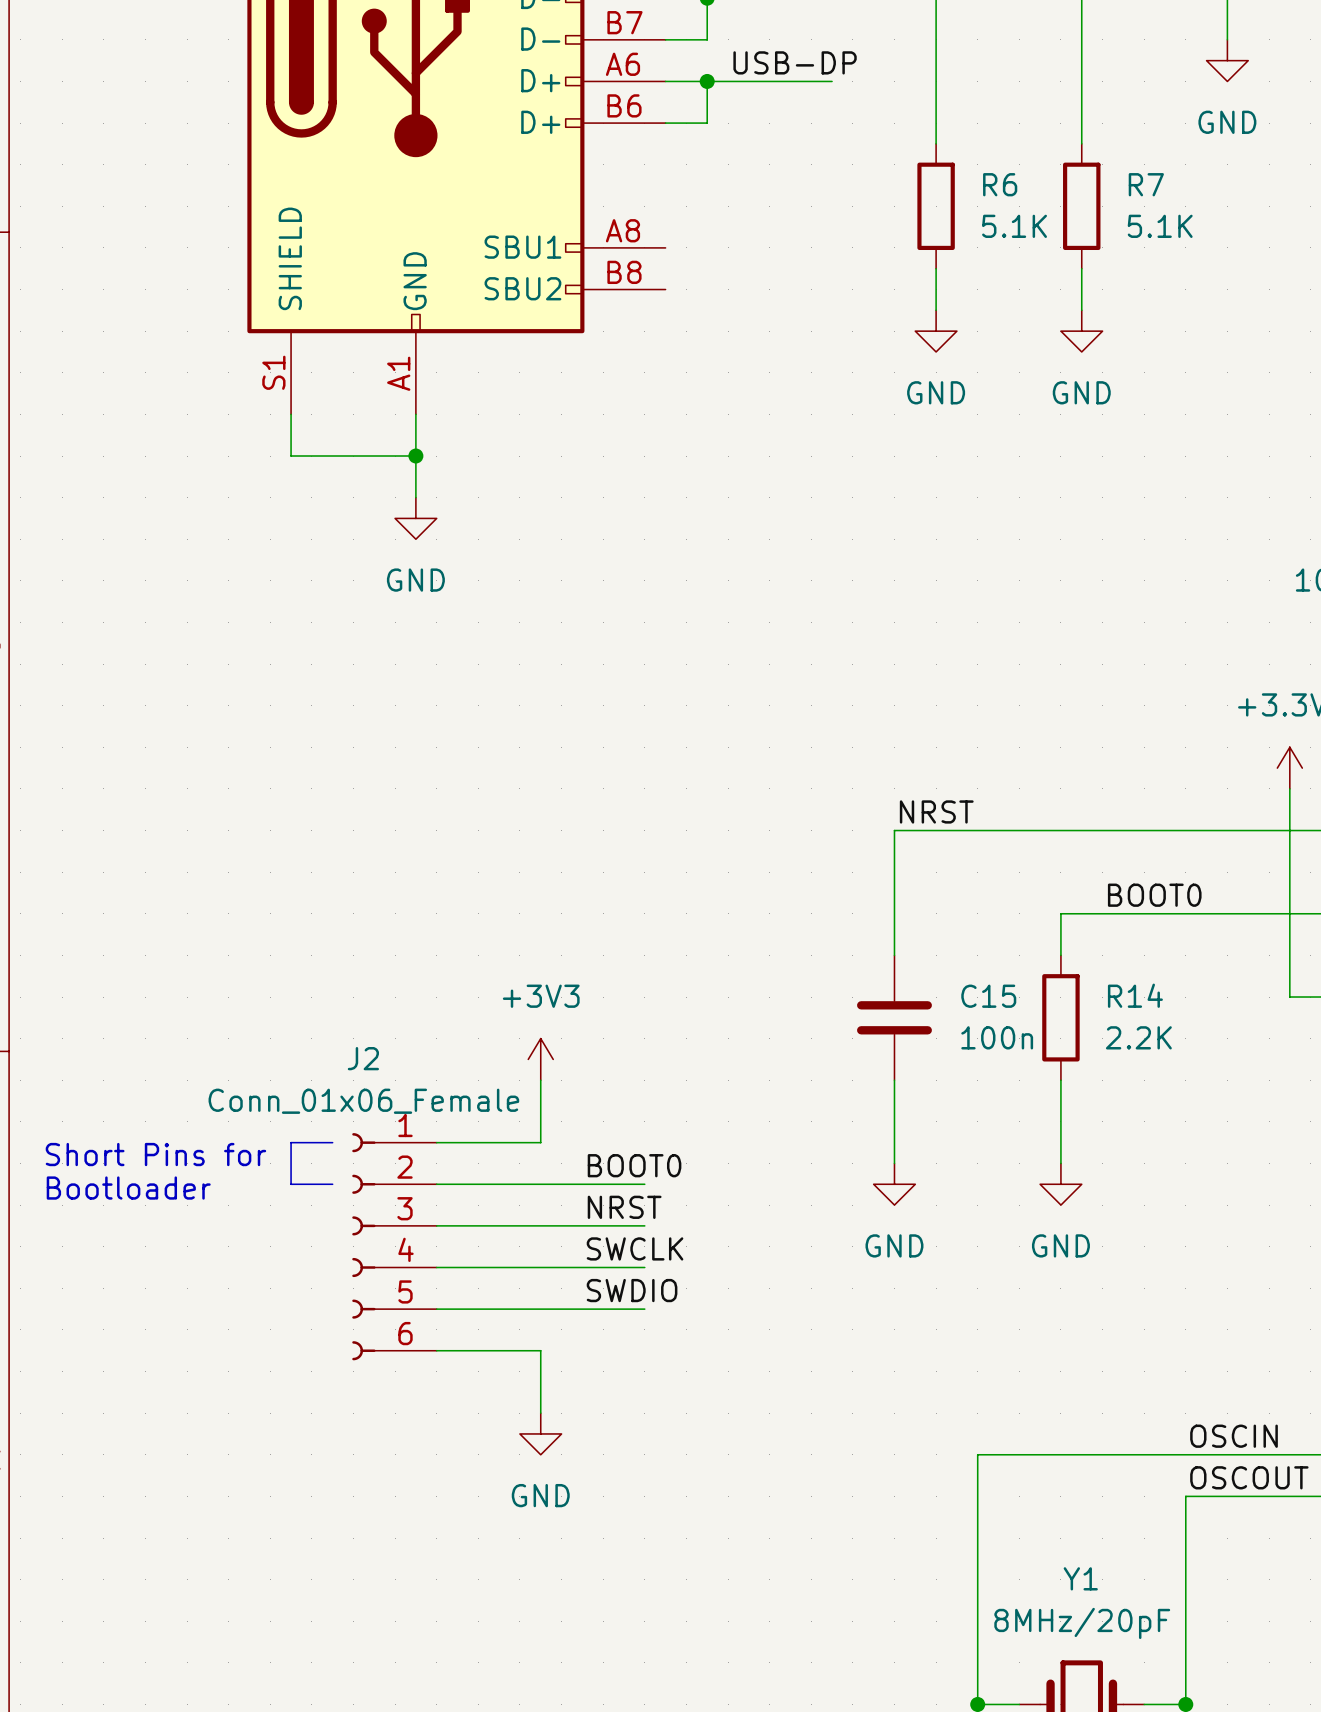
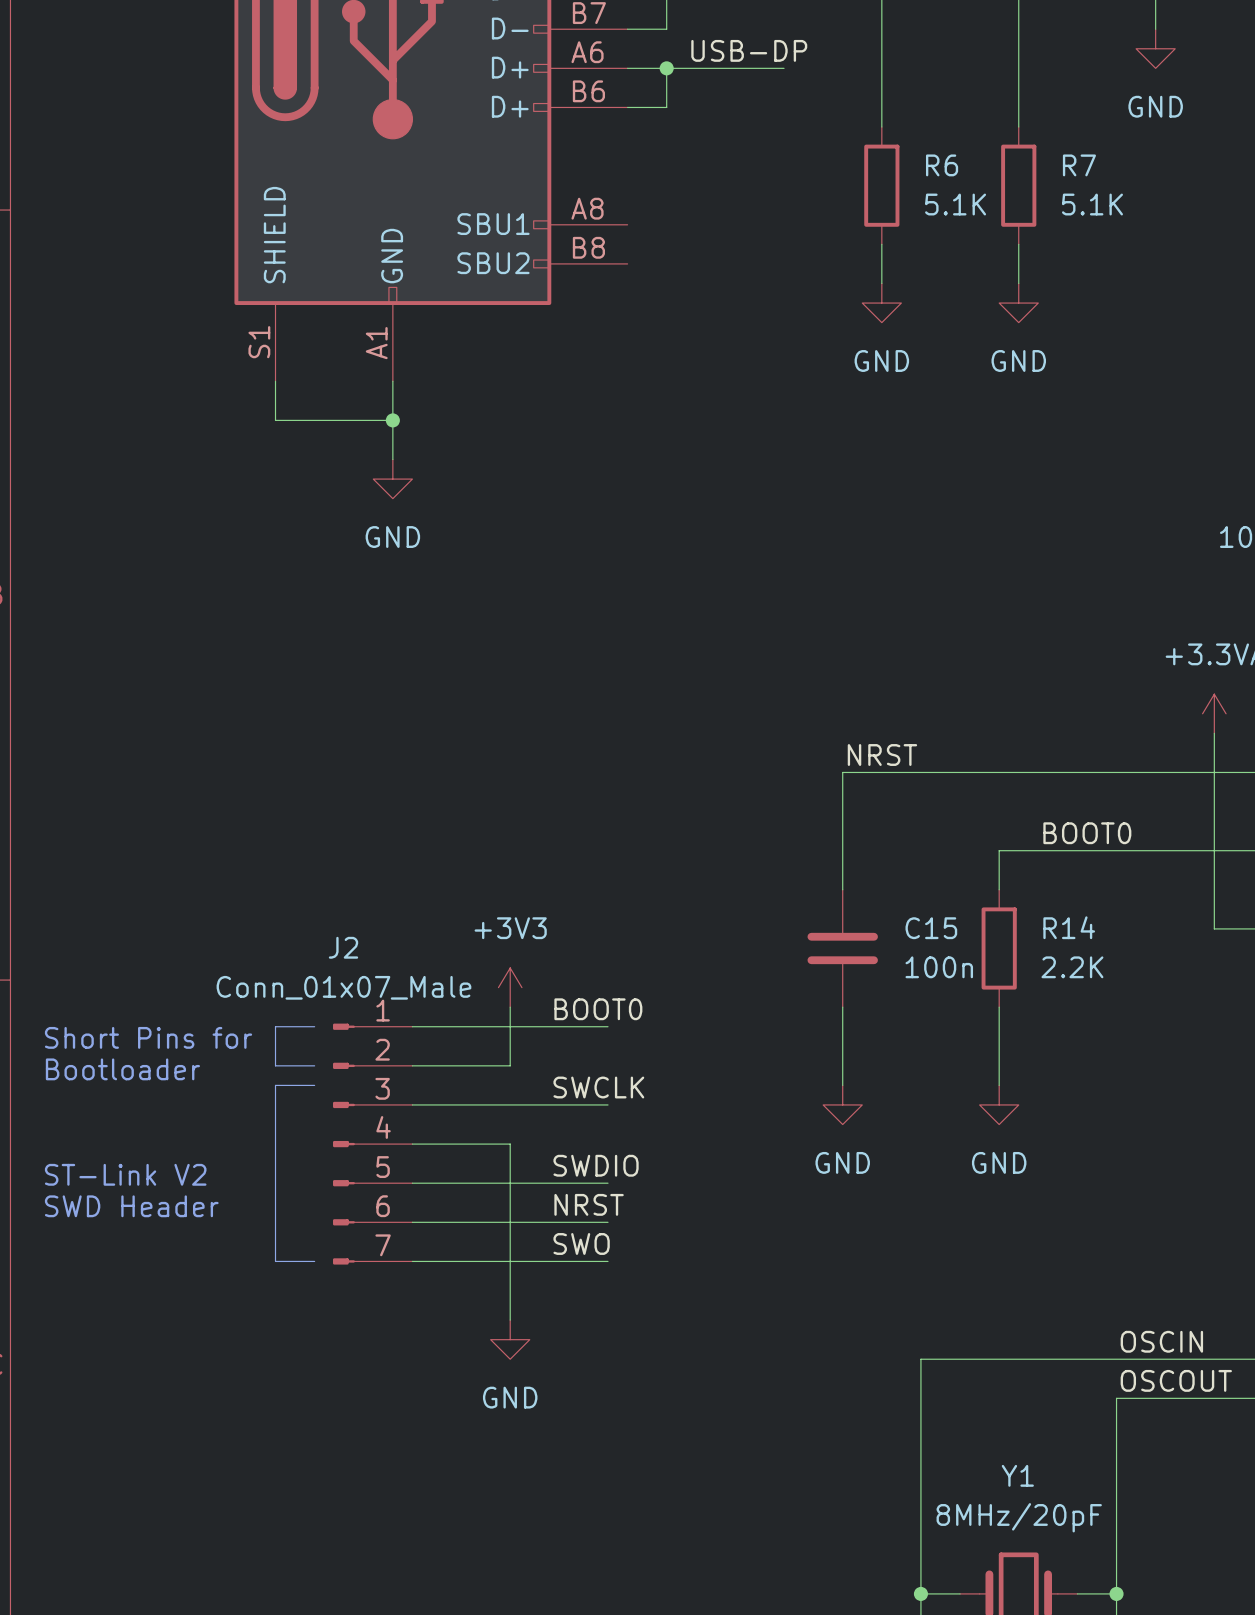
label: none -> BOOT0 (598, 1009)
line: none -> (314, 1026) (275, 1026) (275, 1065)
J2 value: Conn_01x06_Female (363, 1101) -> Conn_01x07_Male (343, 987)
wire: none -> (412, 1026) (608, 1026)
J2 symbol: [352, 1133, 437, 1361] -> [333, 1023, 413, 1265]
line: (291, 1142) (291, 1163) -> (314, 1085) (275, 1085)
text position: Short Pins for (155, 1154) -> Short Pins for (148, 1037)
label: BOOT0 (634, 1165) -> SWCLK (598, 1087)
line: (291, 1184) (332, 1184) -> (275, 1104) (275, 1261) (314, 1261)
text position: Bootloader (128, 1188) -> Bootloader (122, 1069)
label: NRST (624, 1207) -> none
wire: (540, 1225) (644, 1225) -> (510, 1144) (510, 1261) (608, 1261)
label: SWCLK (635, 1248) -> SWDIO (596, 1165)
text: none -> ST-Link V2 (125, 1174)
label: SWDIO (632, 1290) -> NRST (589, 1204)
text: none -> SWD Header (131, 1206)
label: none -> SWO (581, 1243)

